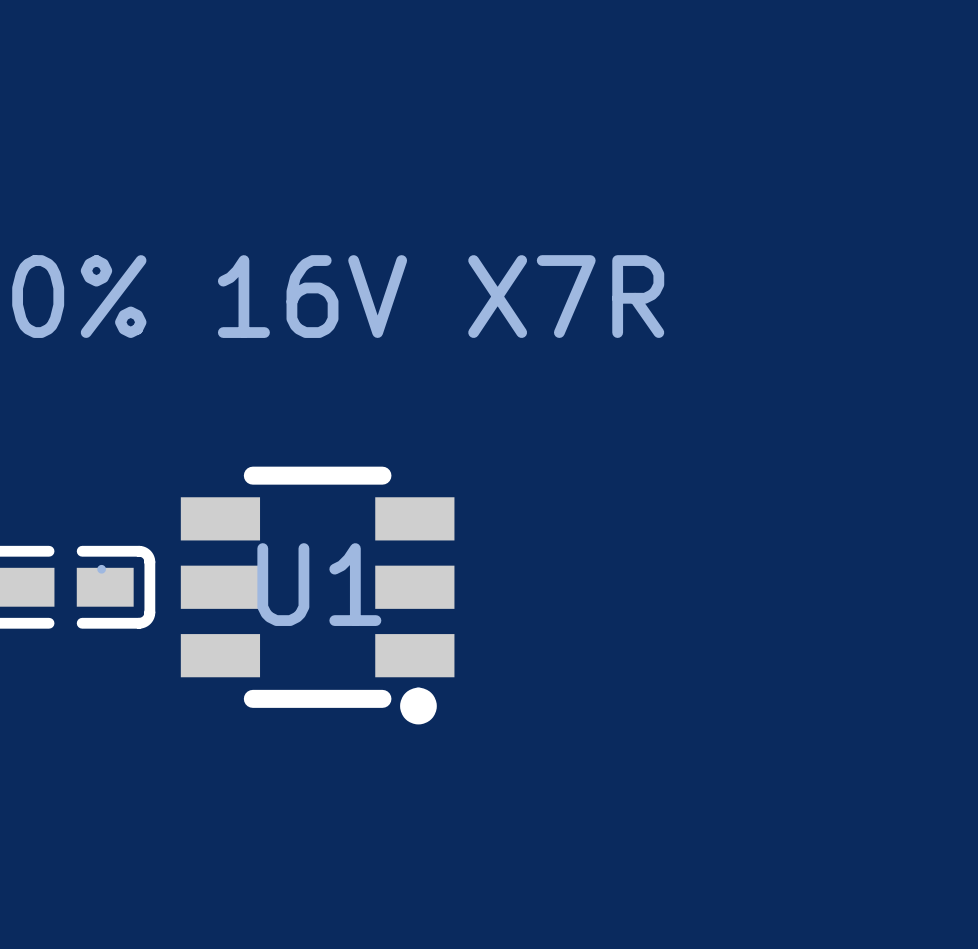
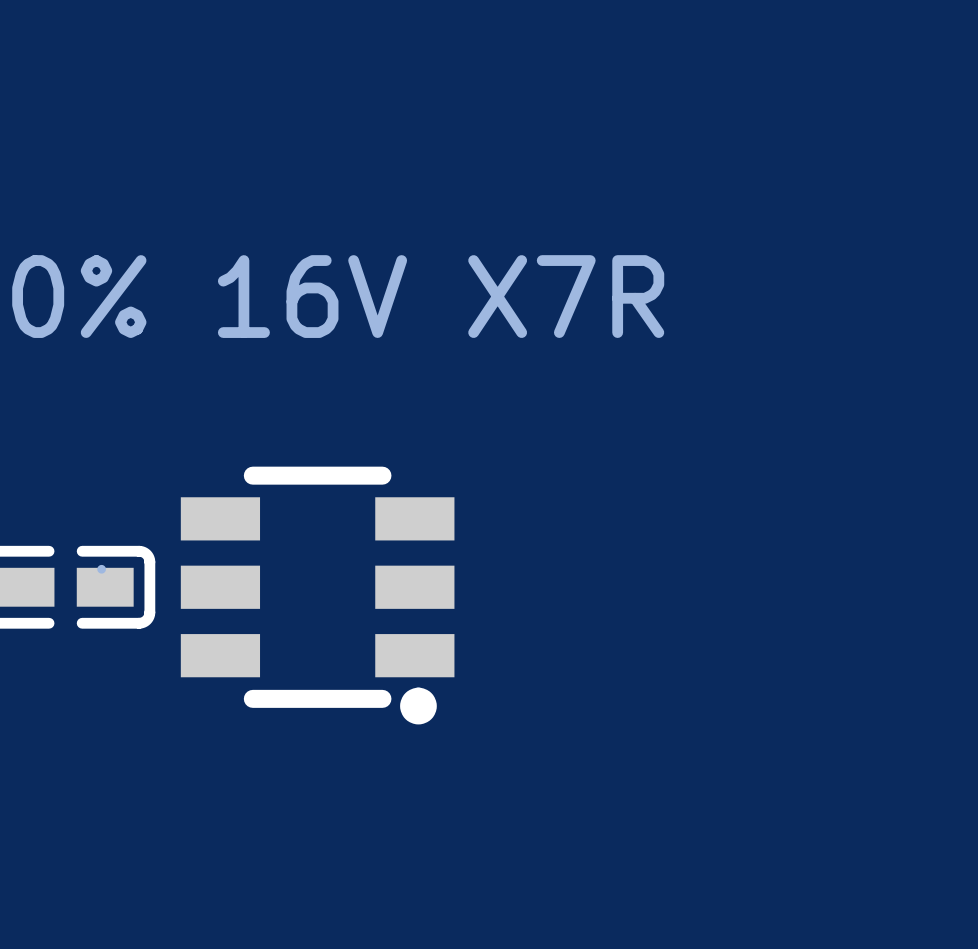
U1 name: U1 (319, 584) -> none

